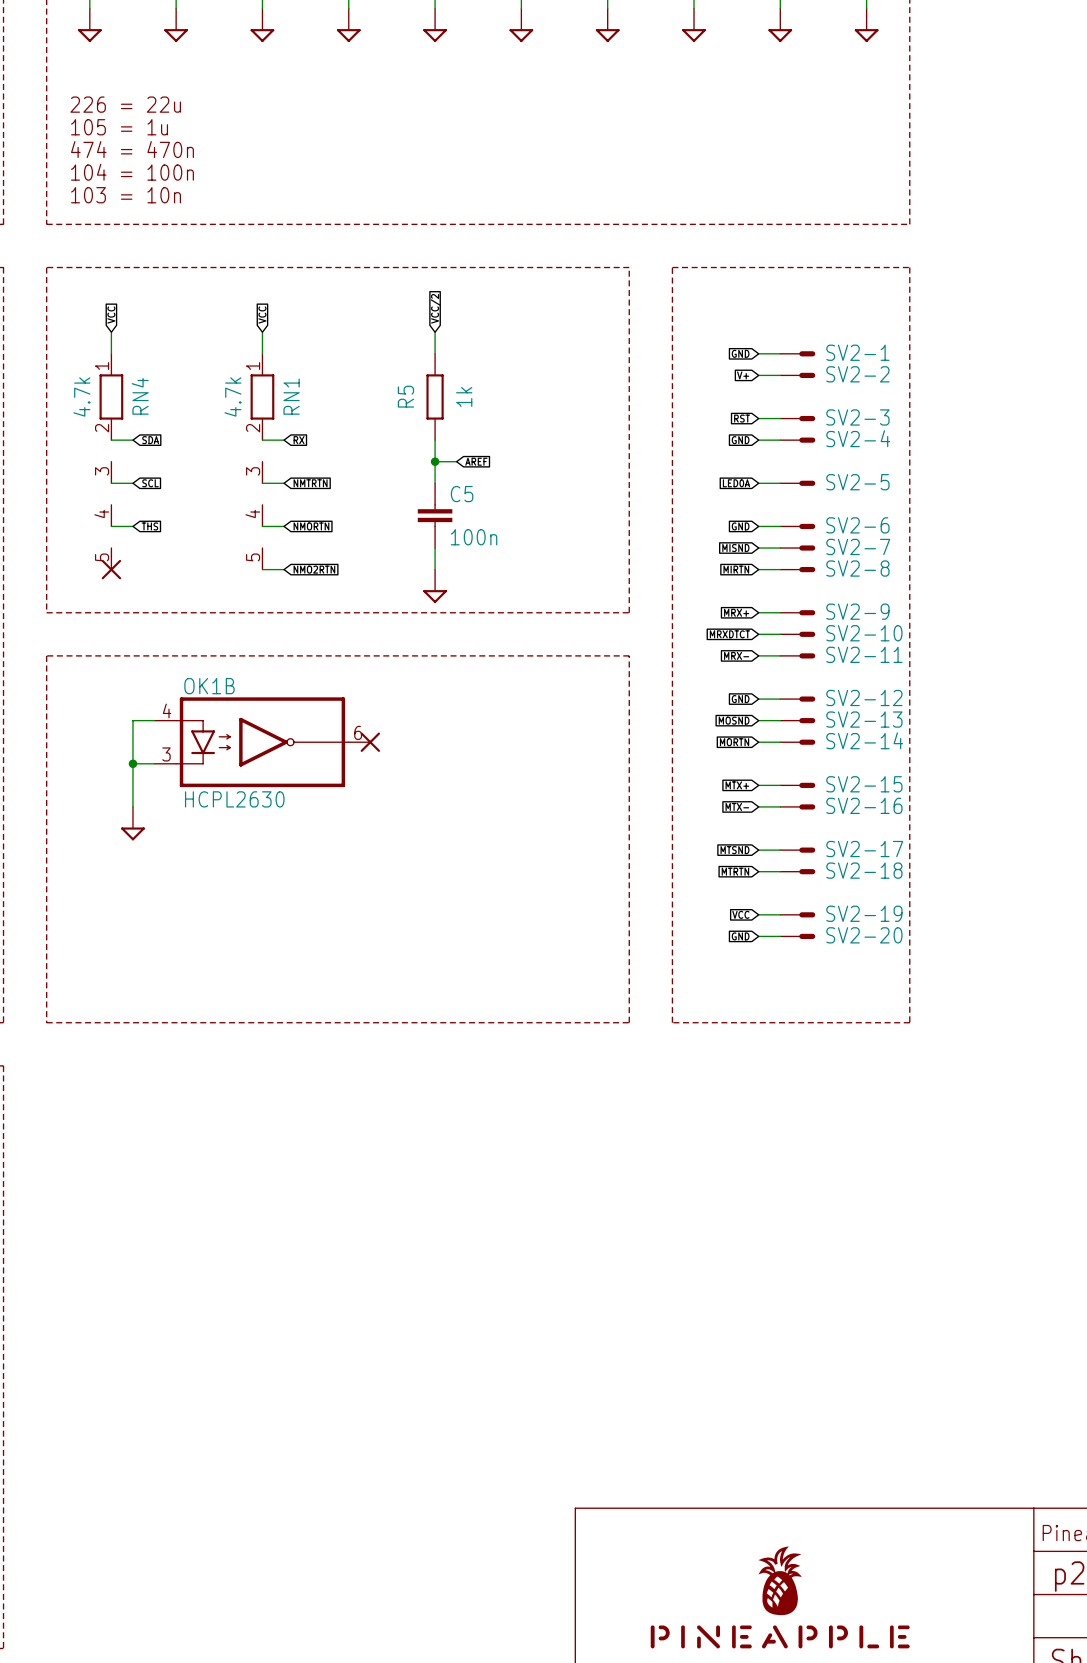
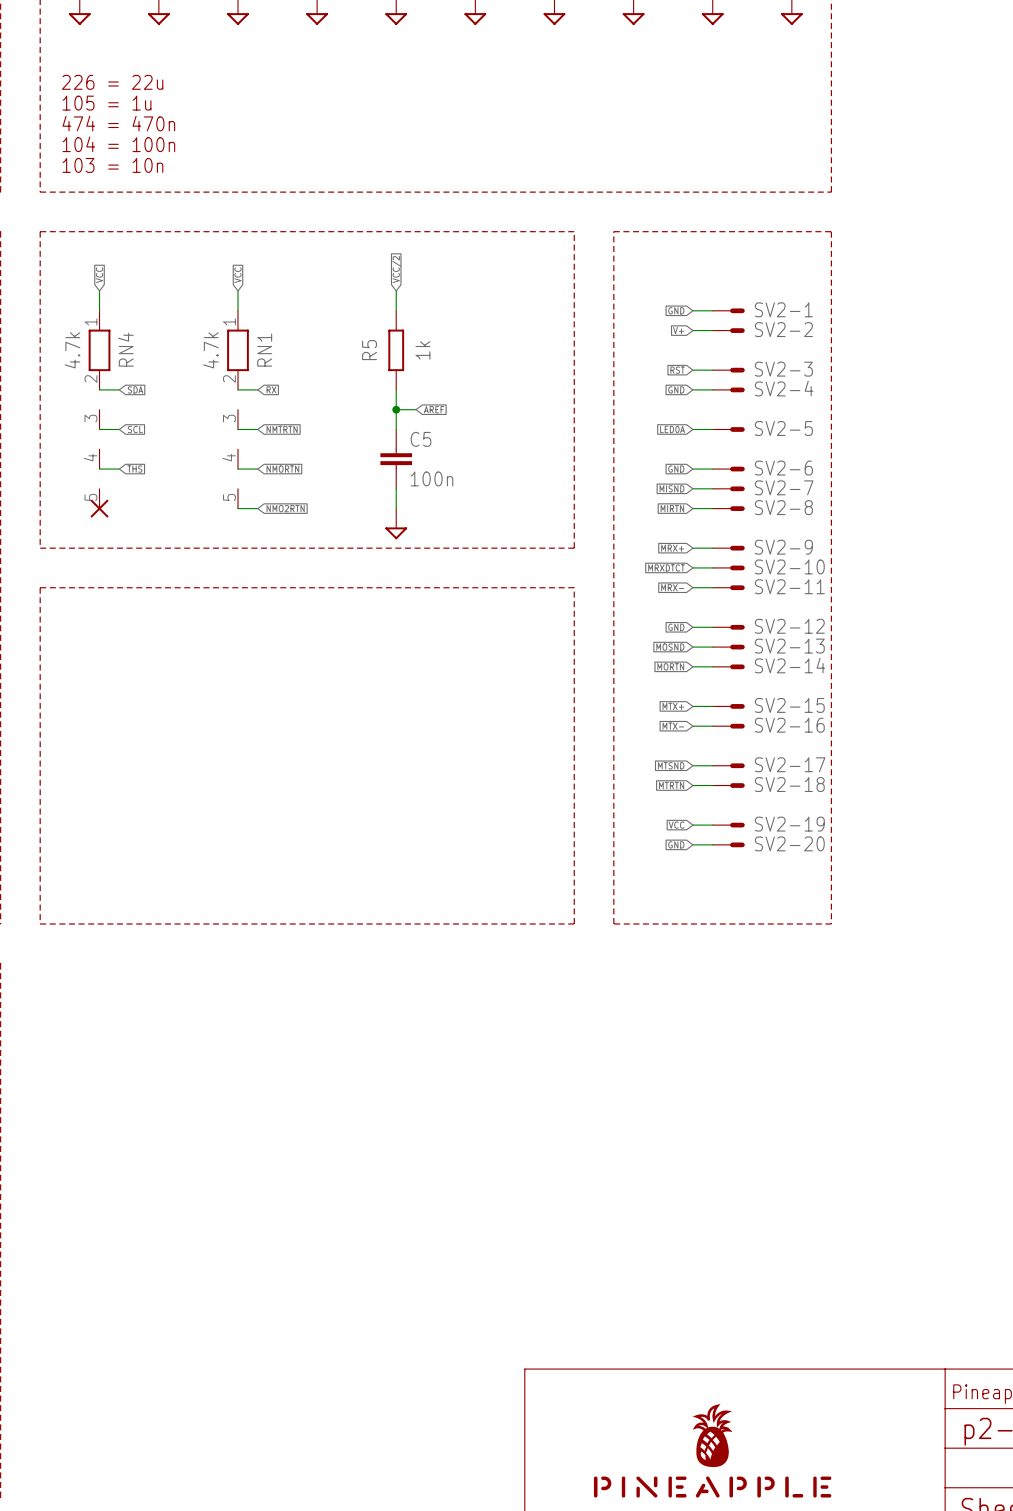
wire: (154, 720) (132, 720) (132, 806) -> none
OK1B: HCPL2630 (262, 742) -> none
part: (370, 742) -> none
wire: (132, 763) (154, 763) -> none
junction: (132, 763) -> none
power symbol: (132, 823) -> none

